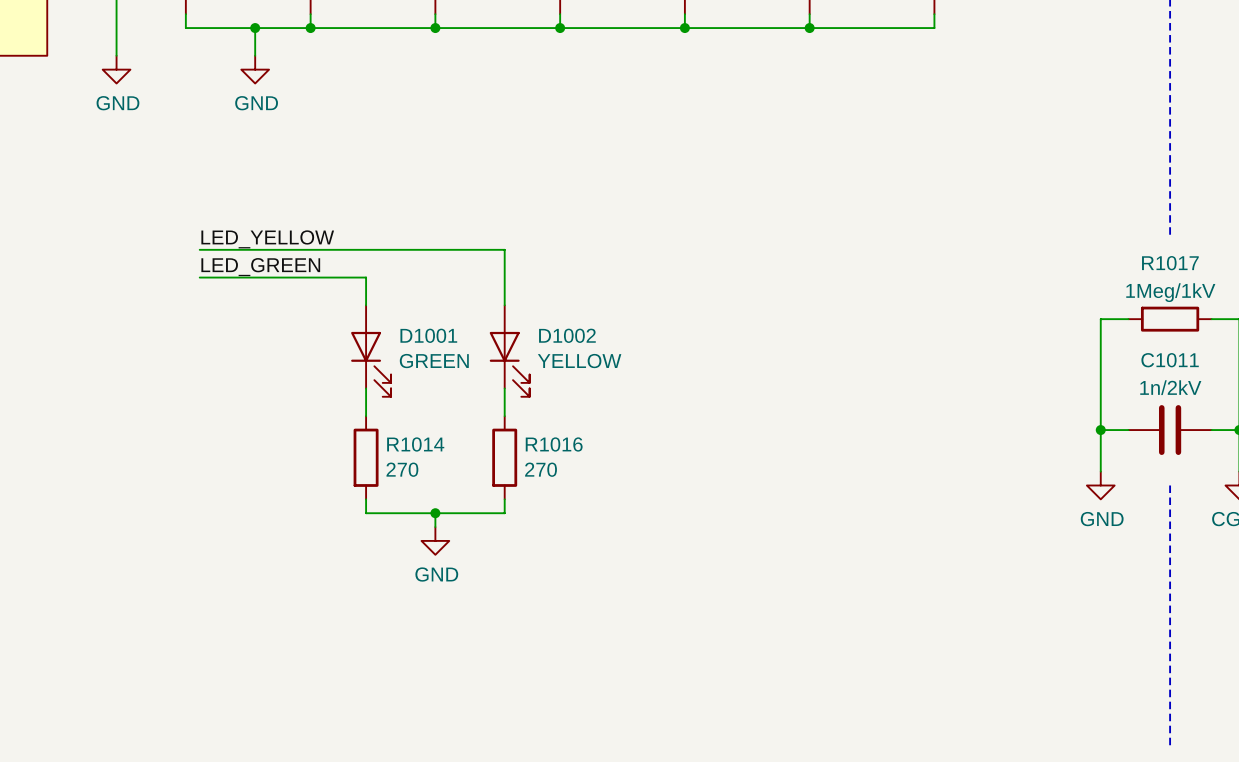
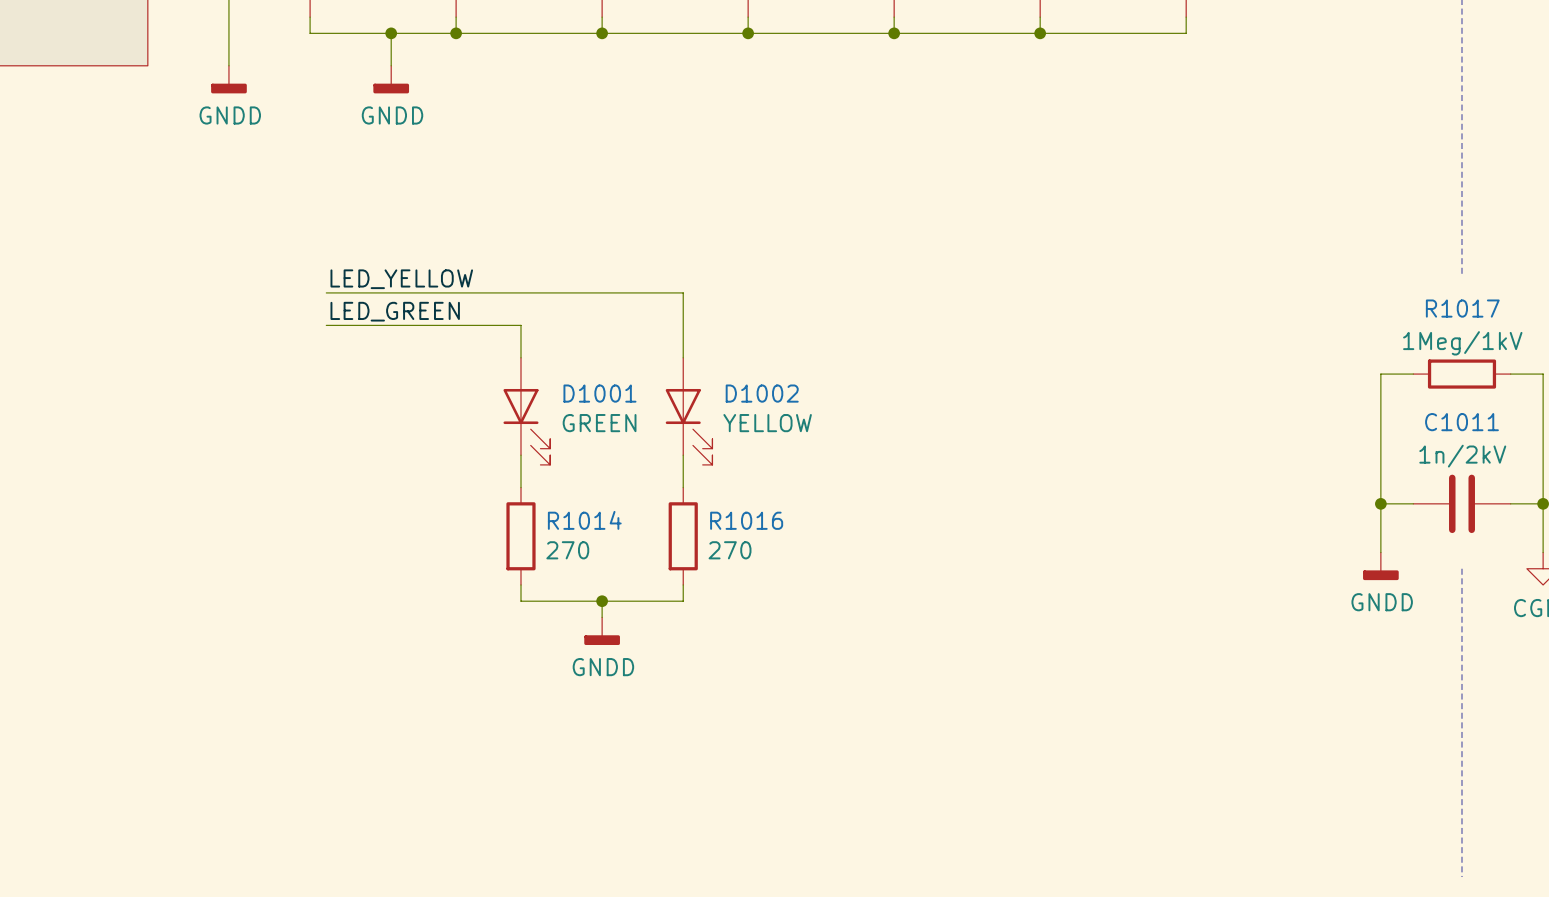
power symbol: GND (116, 69) -> GNDD (228, 79)
power symbol: GND (255, 69) -> GNDD (391, 79)
power symbol: GND (1100, 485) -> GNDD (1380, 566)
power symbol: GND (435, 540) -> GNDD (602, 631)

